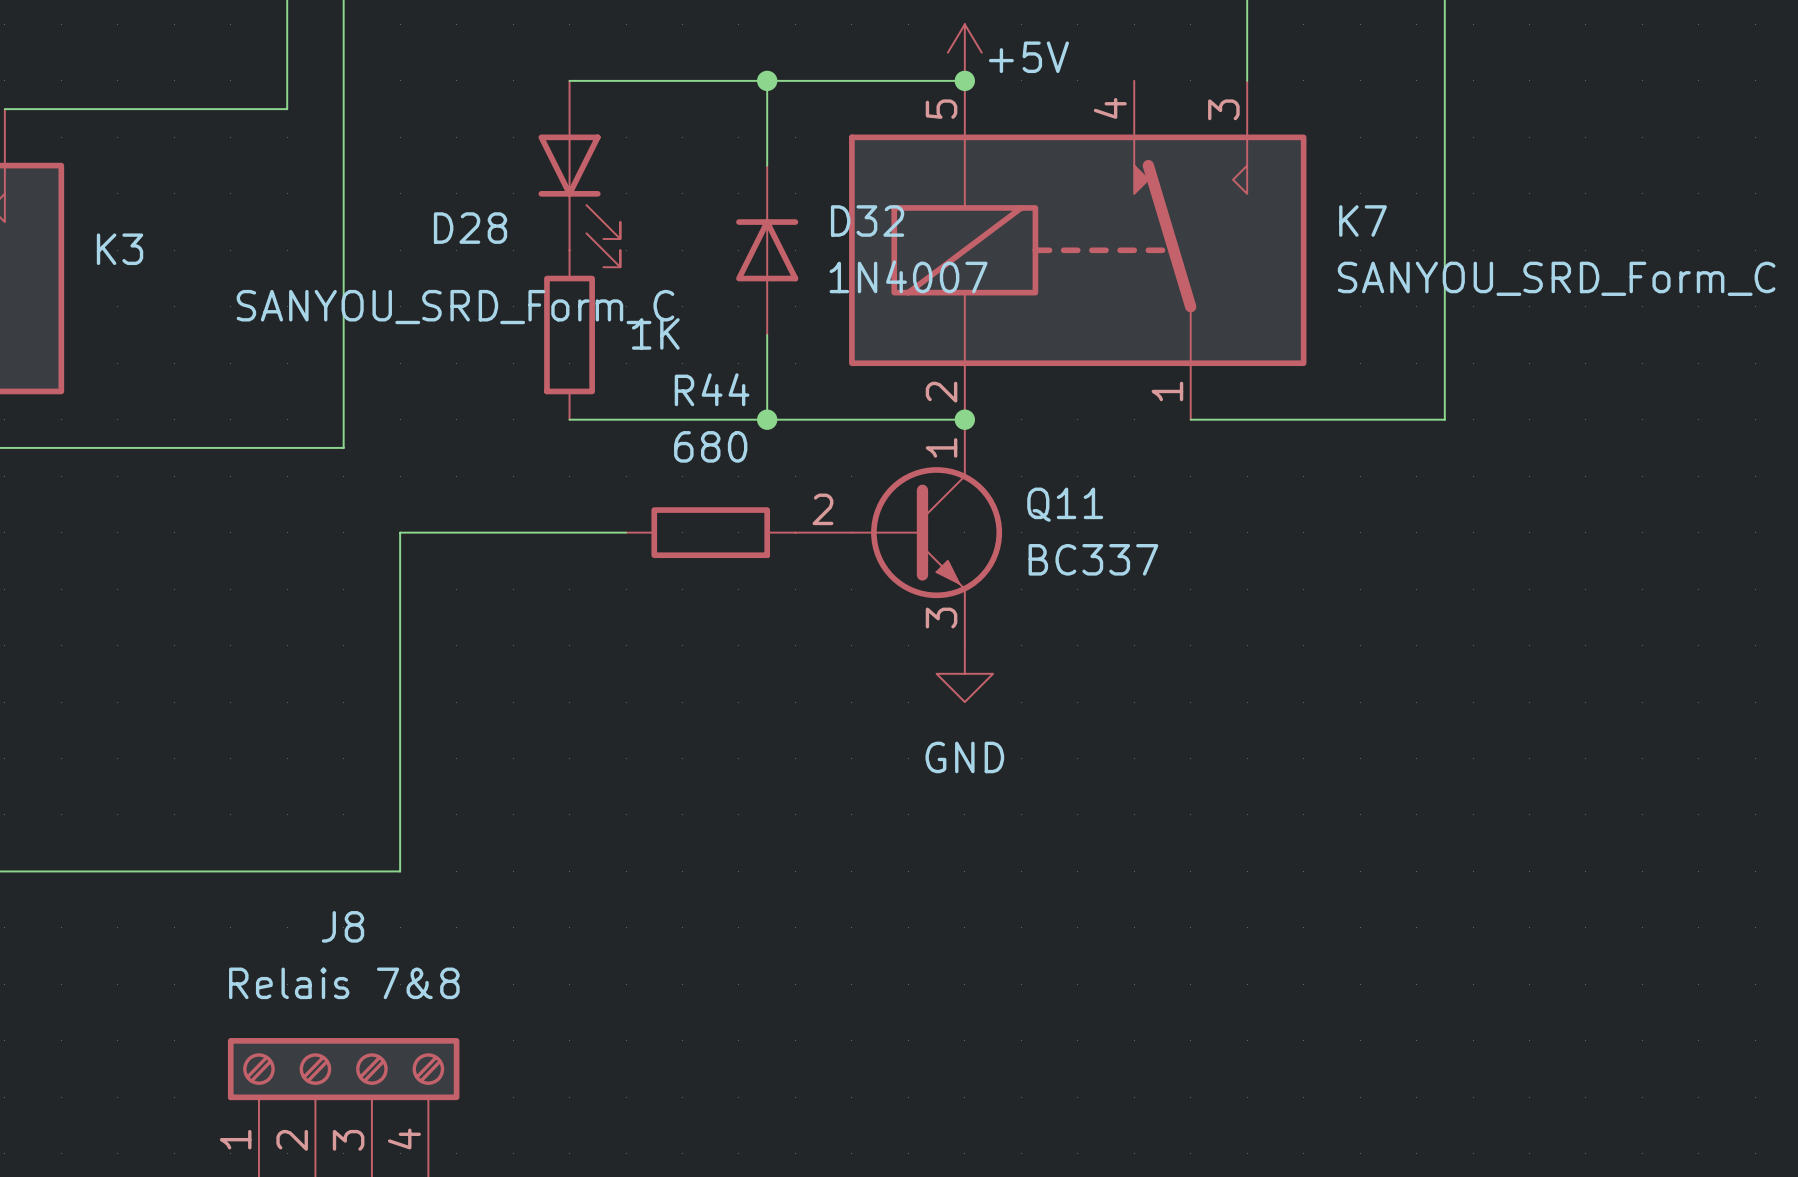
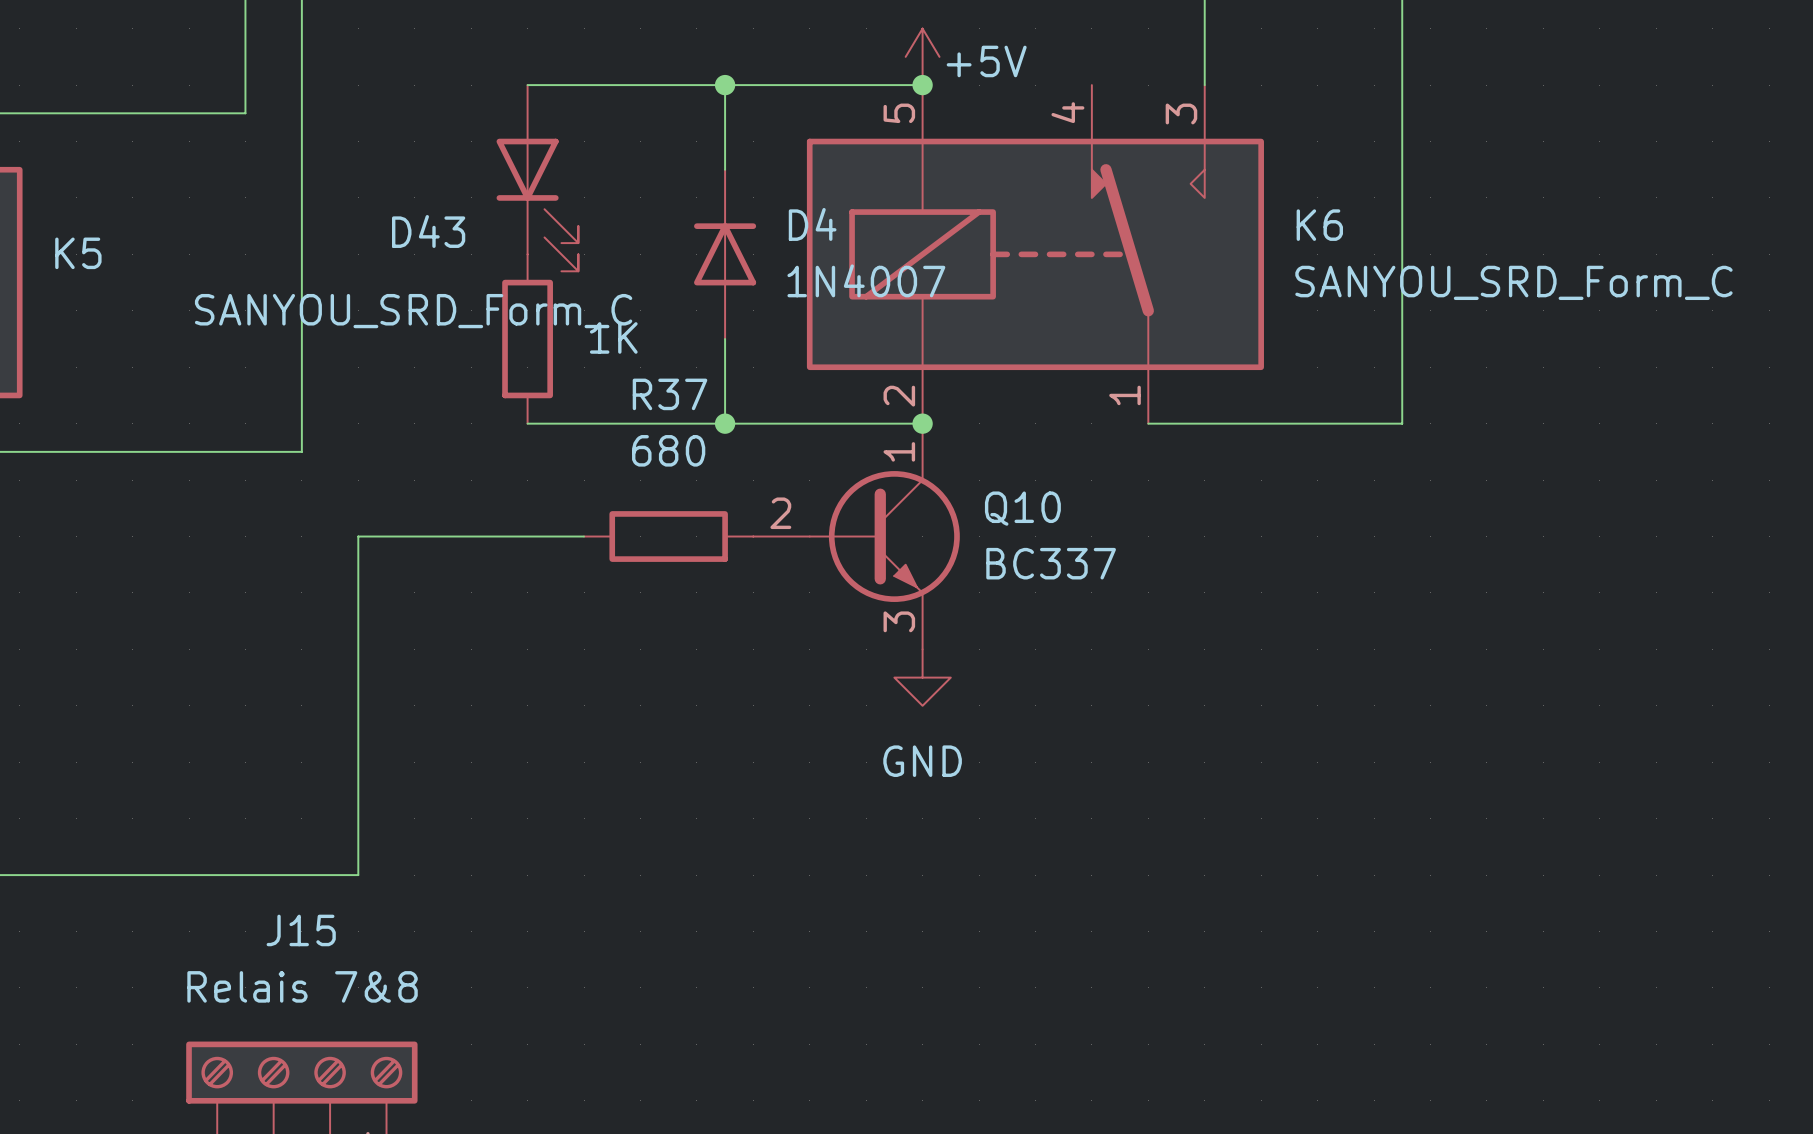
D32 name: D32 (867, 221) -> D4 (812, 224)
K7 name: K7 (1363, 221) -> K6 (1319, 225)
D28 name: D28 (470, 228) -> D43 (428, 231)
K3 name: K3 (120, 249) -> K5 (78, 253)
R44 name: R44 (712, 389) -> R37 (670, 394)
Q11 name: Q11 (1065, 504) -> Q10 (1022, 508)
J8 name: J8 (343, 926) -> J15 (301, 930)

